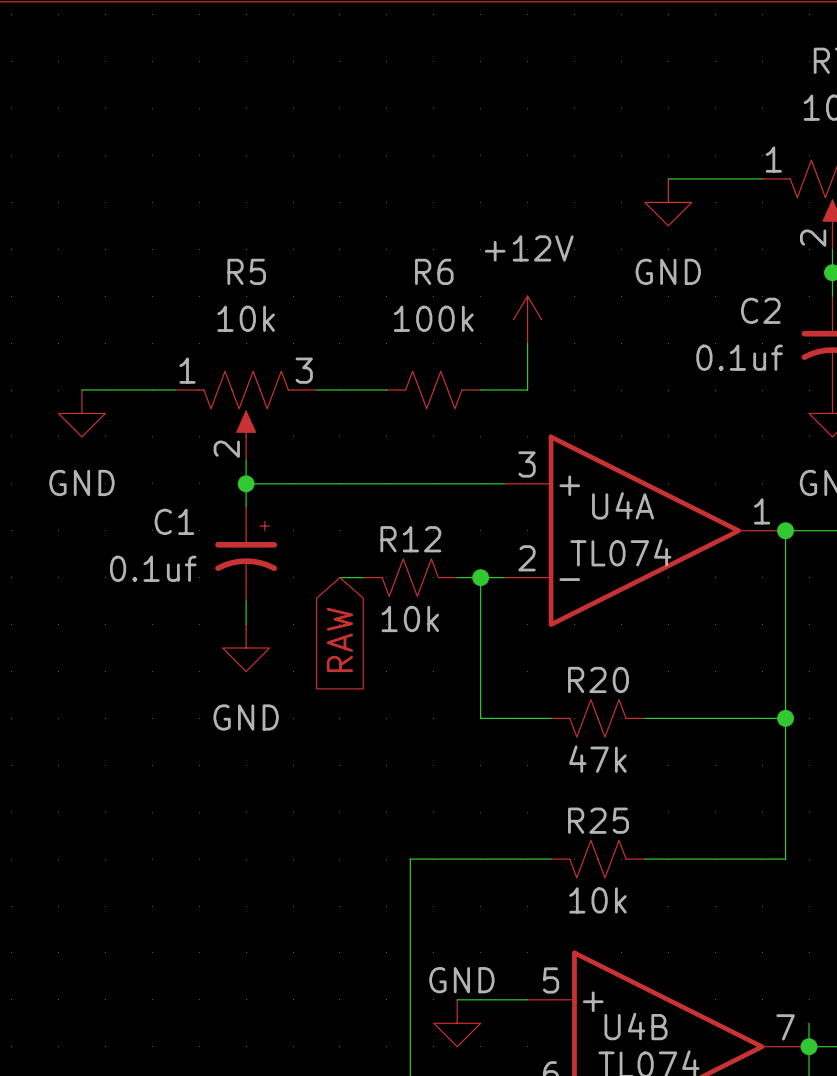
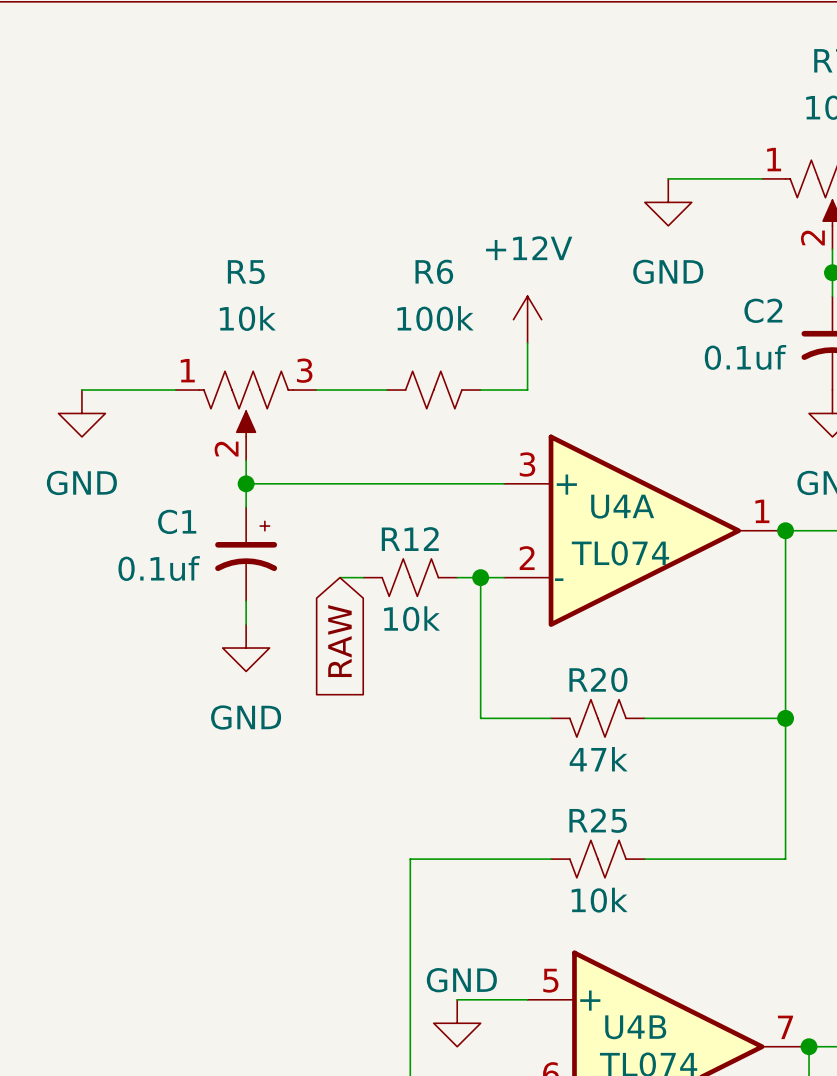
wire: (809, 1023) (809, 1046) -> none

